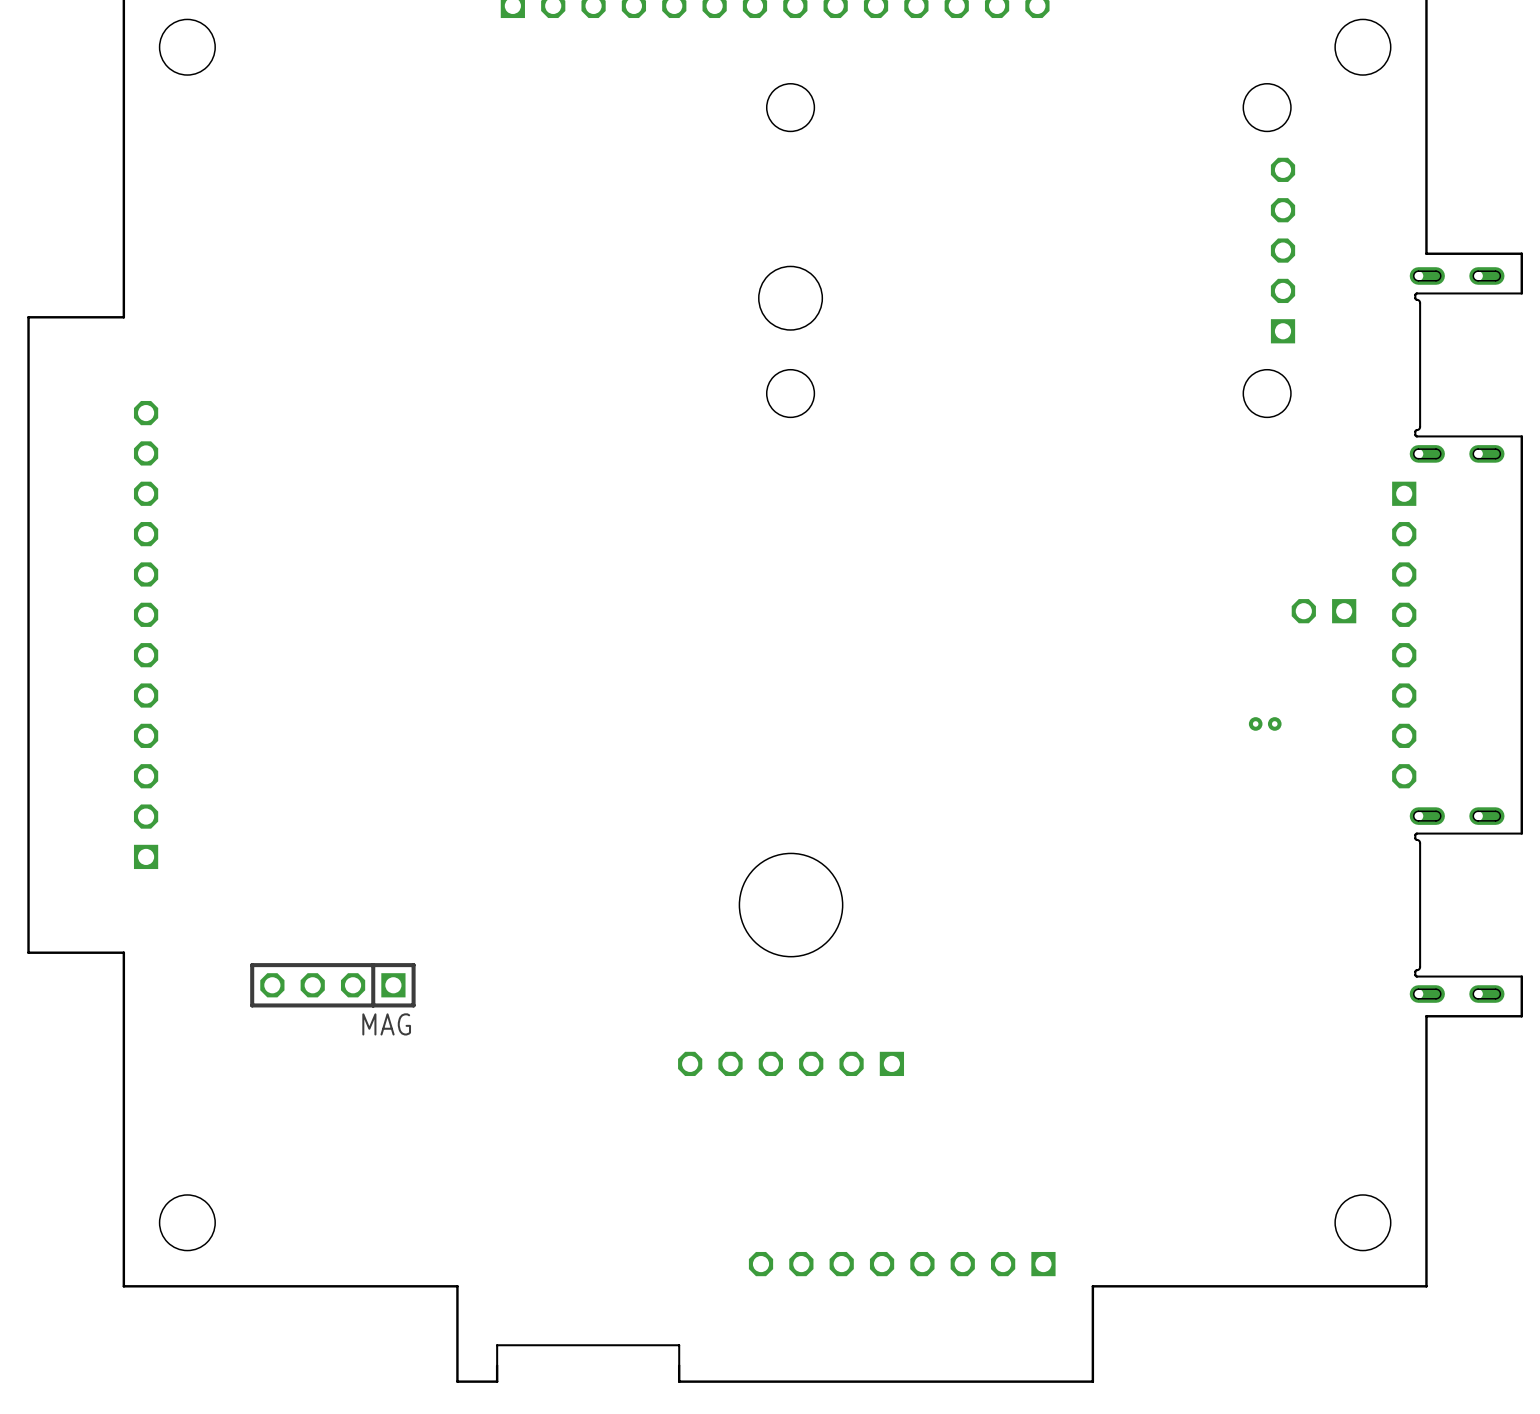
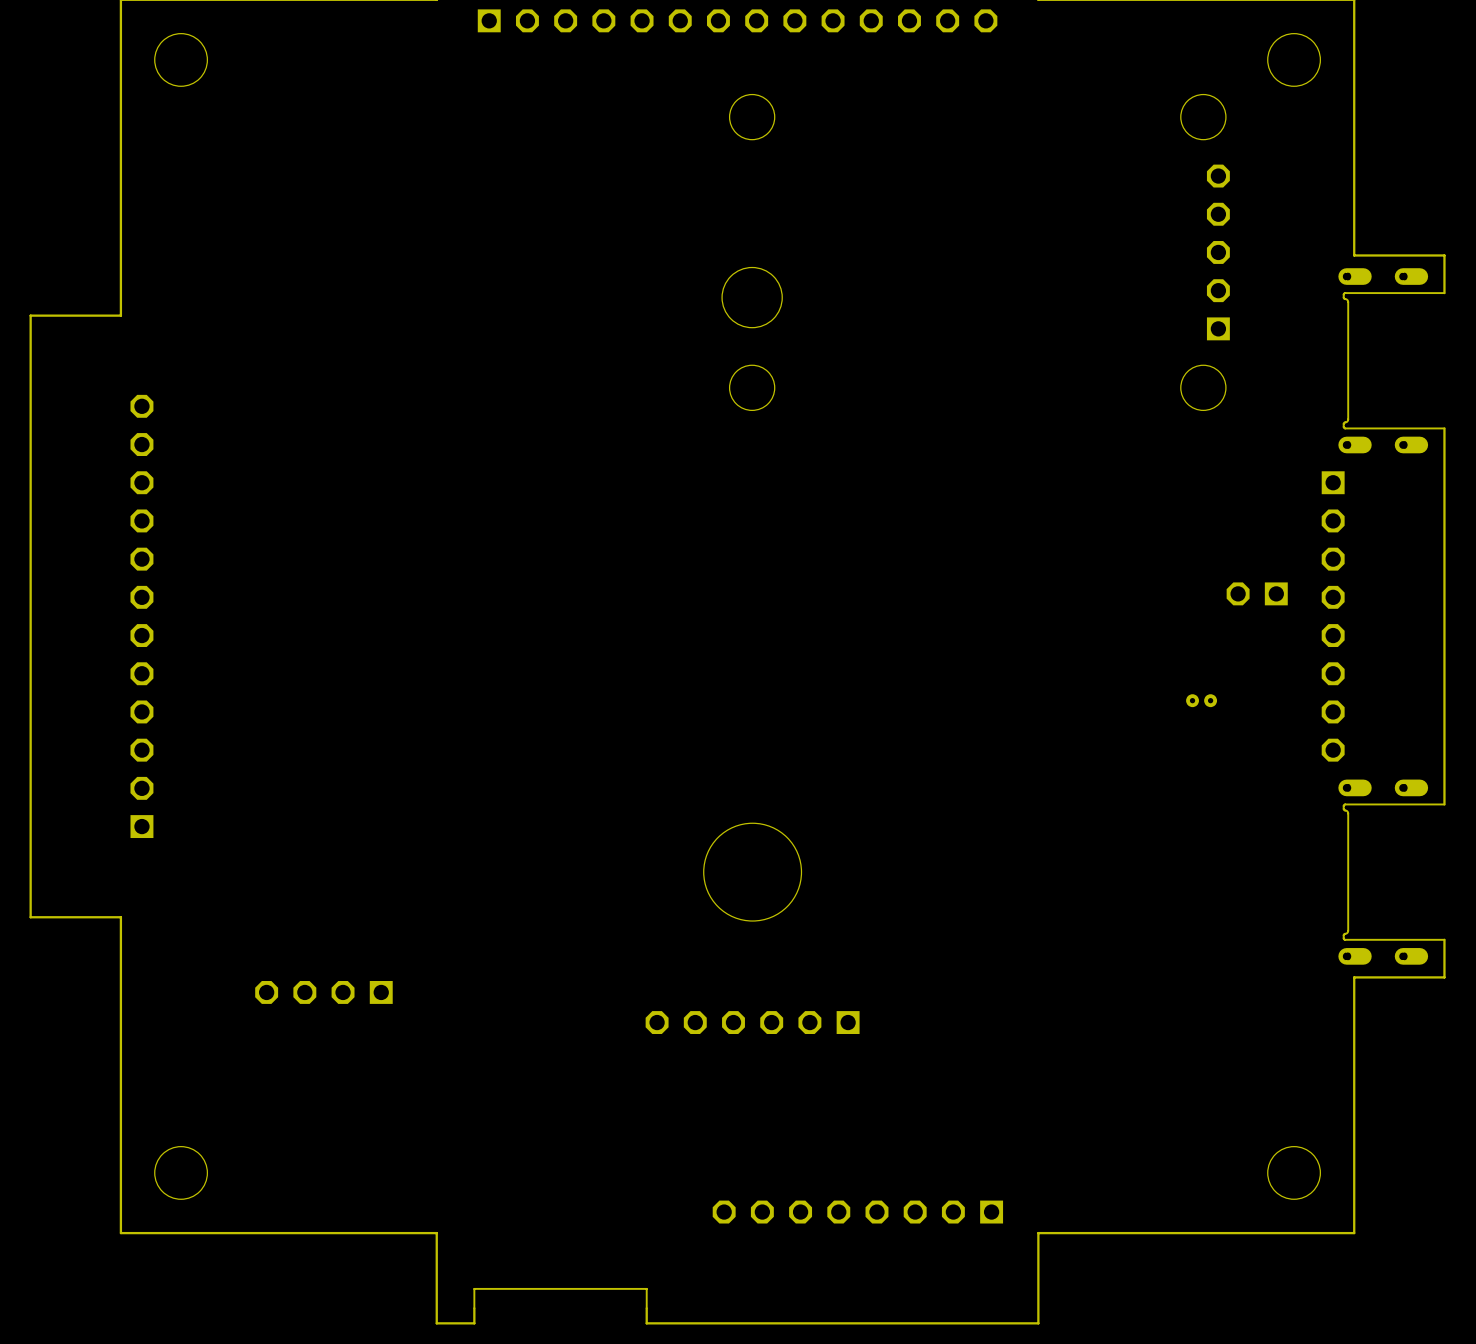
MAG side: bottom (332, 985) -> top (323, 992)

